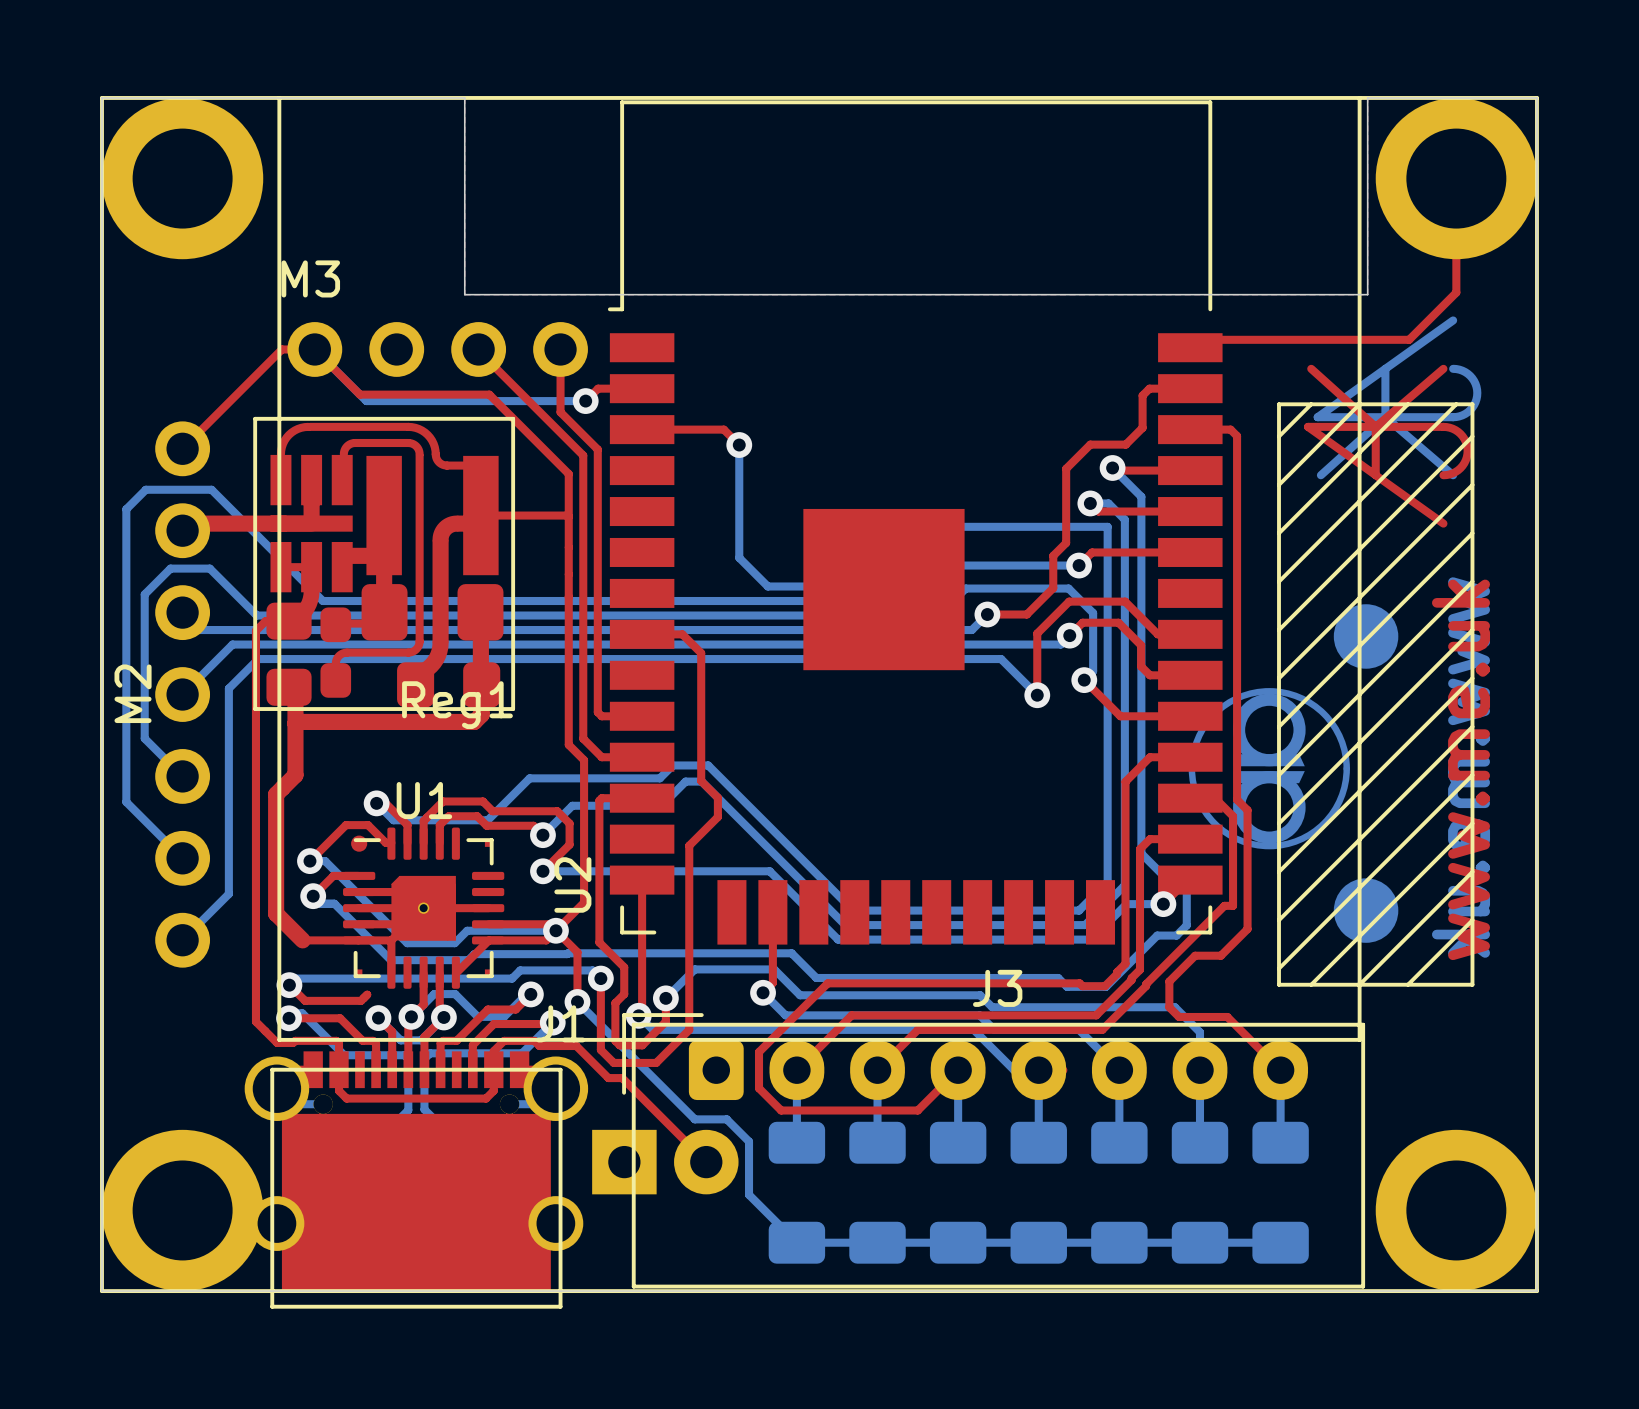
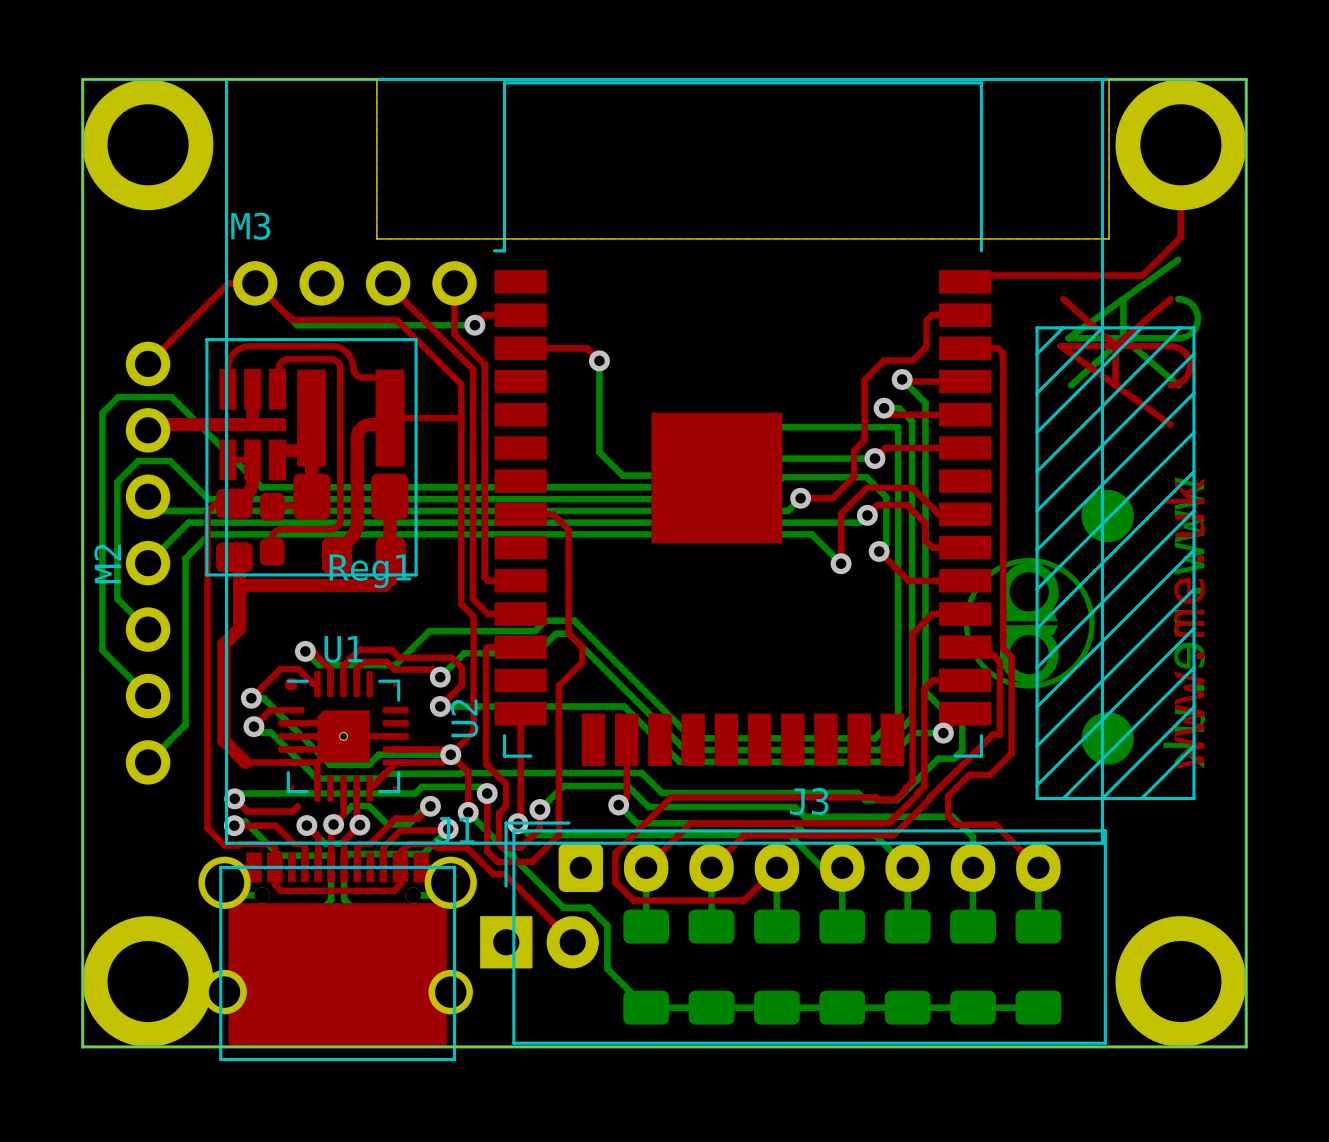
U1 footprint: [343, 827, 505, 989] -> [278, 671, 409, 802]

